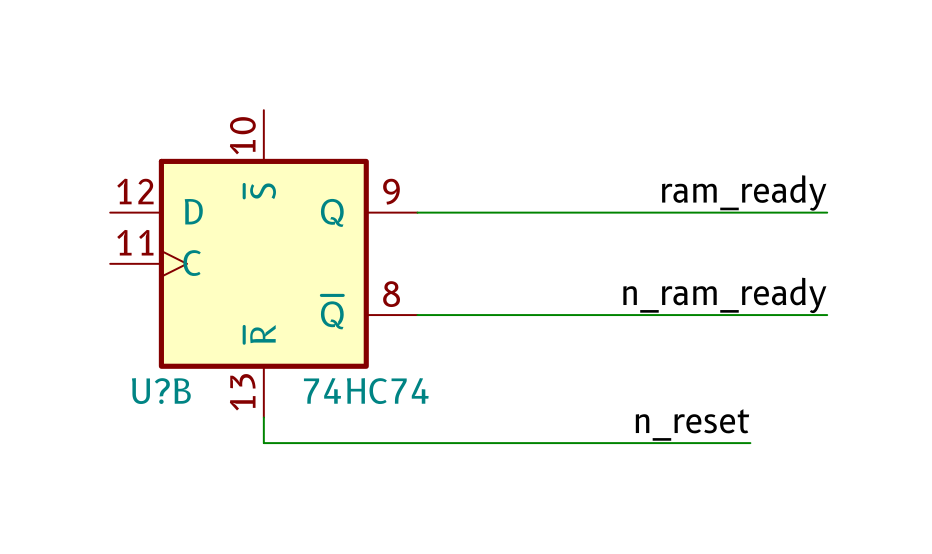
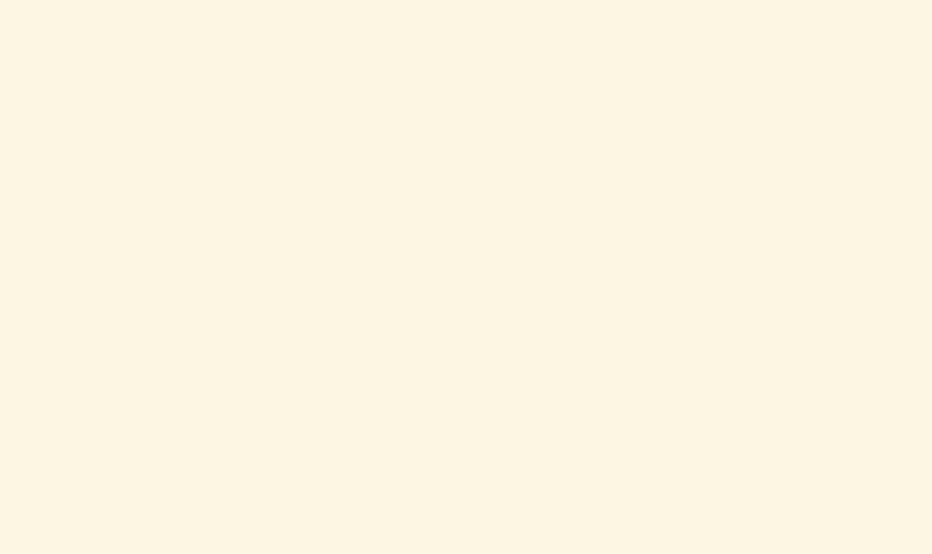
label: ram_ready (744, 192) -> none
wire: (417, 212) (827, 212) -> none
U?B: 74HC74 (263, 263) -> none
label: n_ram_ready (724, 295) -> none
wire: (417, 315) (827, 315) -> none
wire: (263, 417) (263, 443) (750, 443) -> none
label: n_reset (692, 424) -> none

